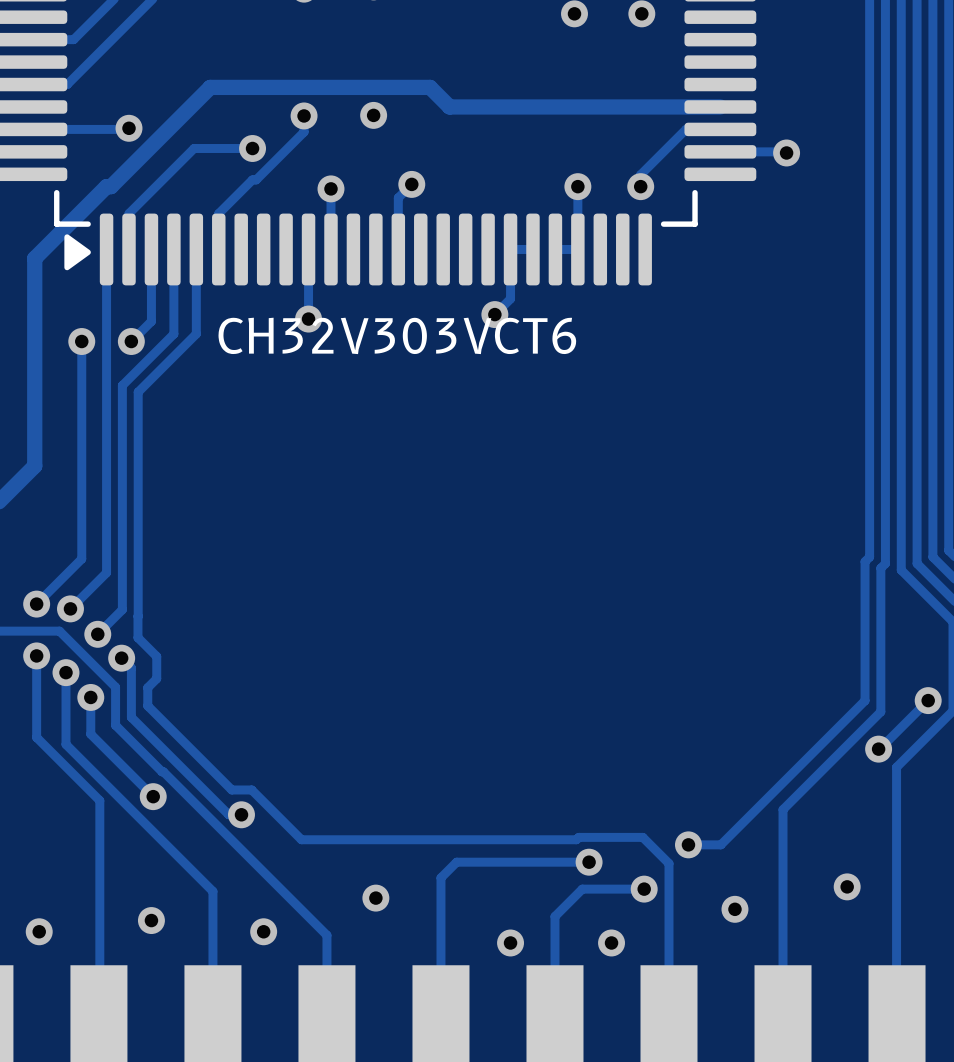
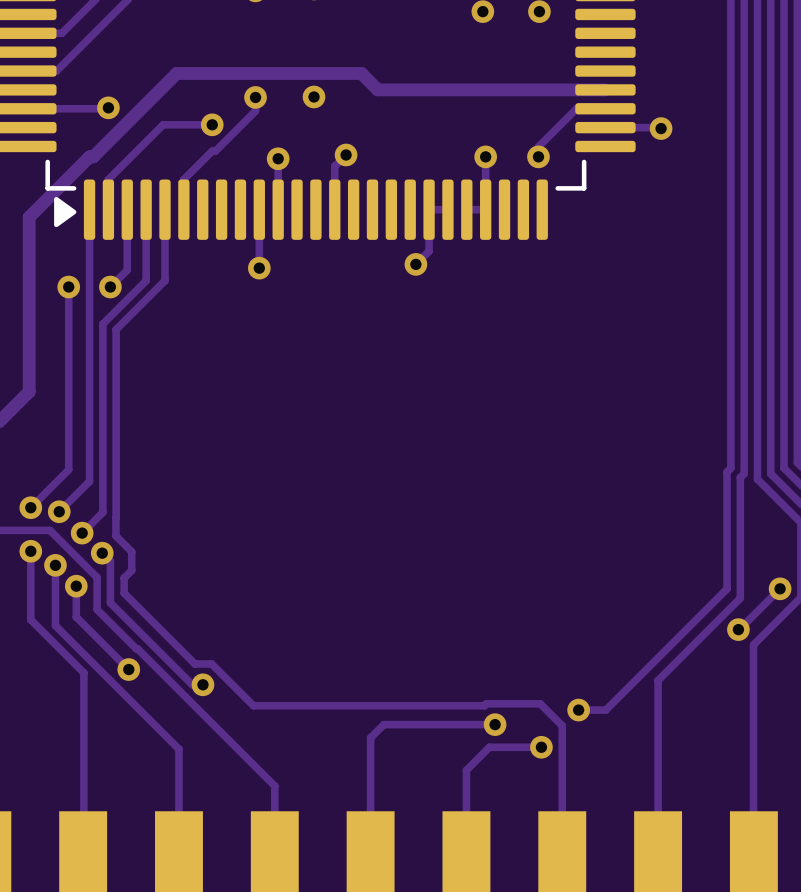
part value: CH32V303VCT6 (397, 335) -> none
via: (847, 886) -> none
via: (375, 898) -> none
via: (734, 909) -> none
via: (151, 920) -> none
via: (39, 931) -> none
via: (263, 931) -> none
via: (510, 942) -> none
via: (611, 942) -> none

